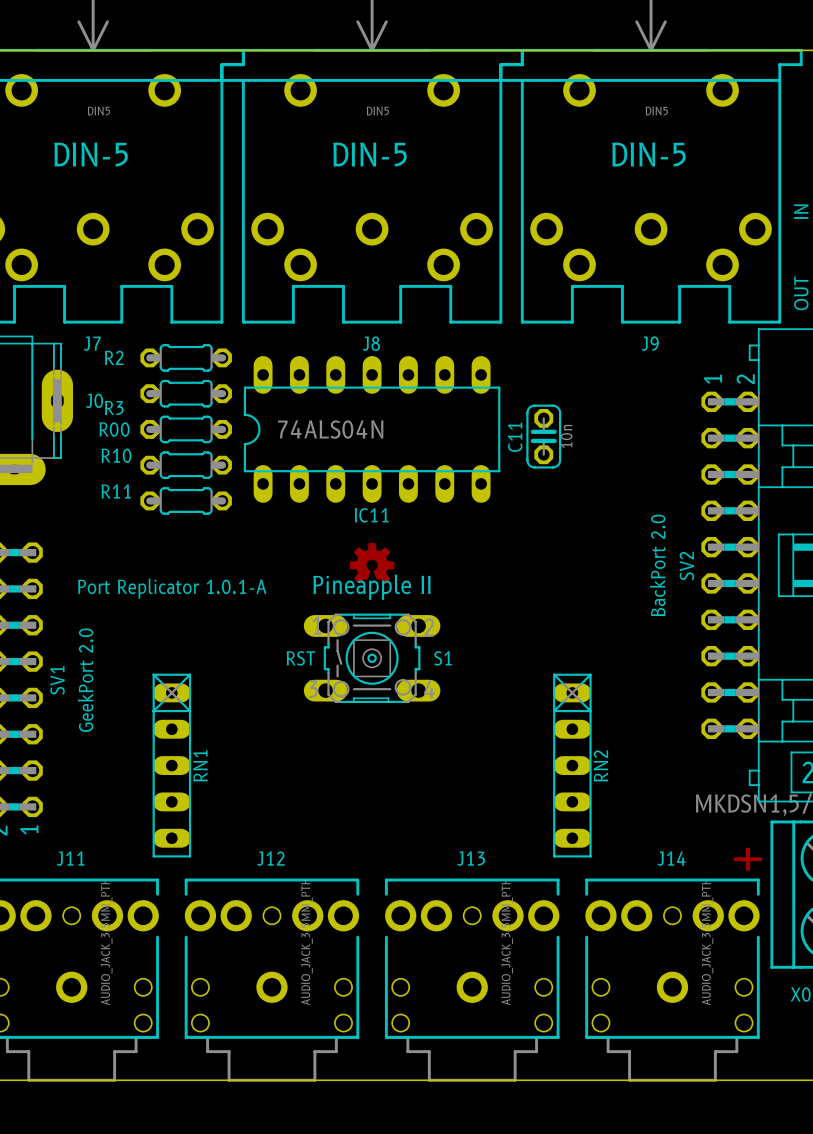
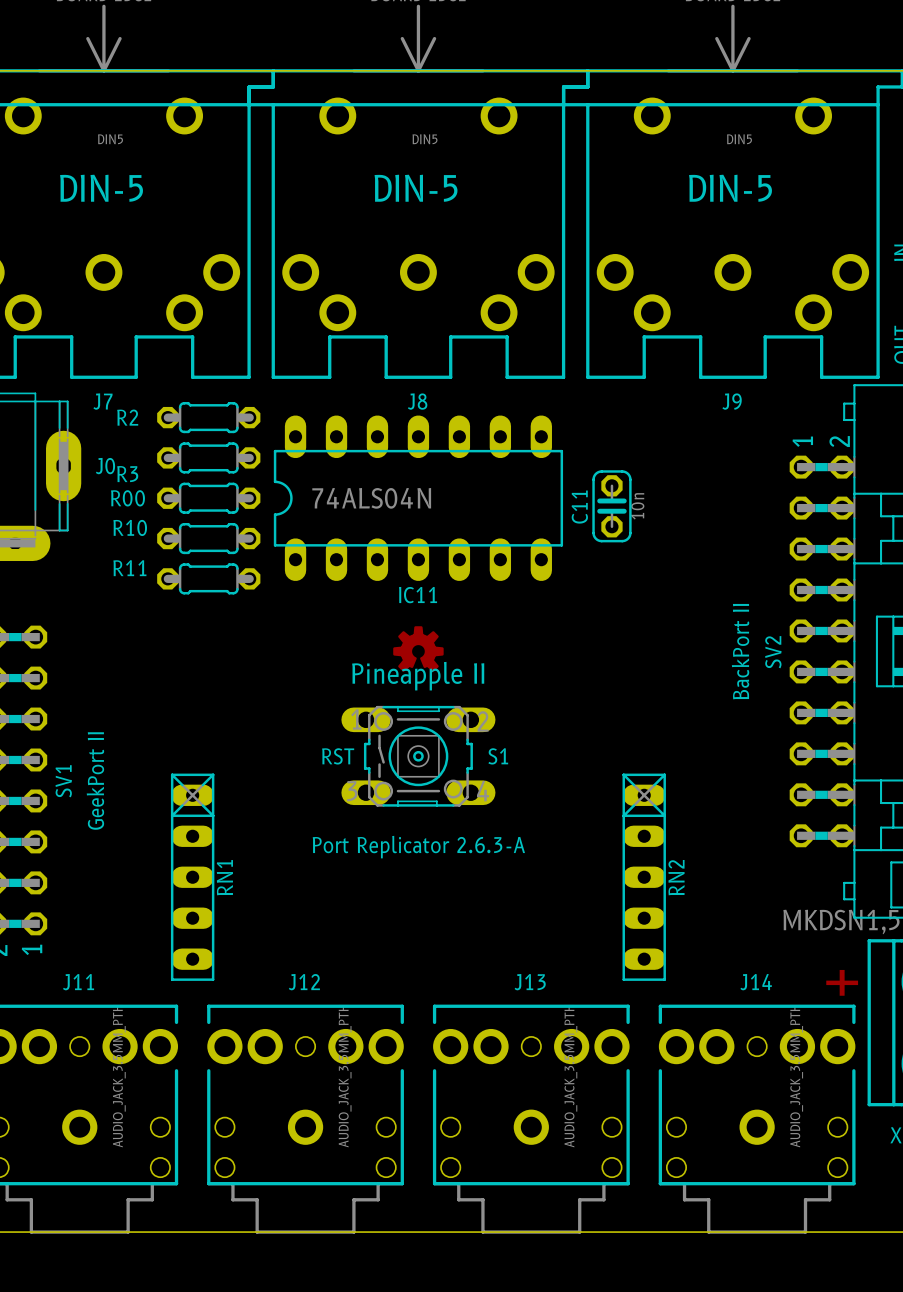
text: BackPort 2.0 (657, 565) -> BackPort II (740, 651)
text: Port Replicator 1.0.1-A (172, 588) -> none
text: GeekPort 2.0 (85, 680) -> GeekPort II (95, 781)
text: none -> Port Replicator 2.6.3-A (418, 847)

